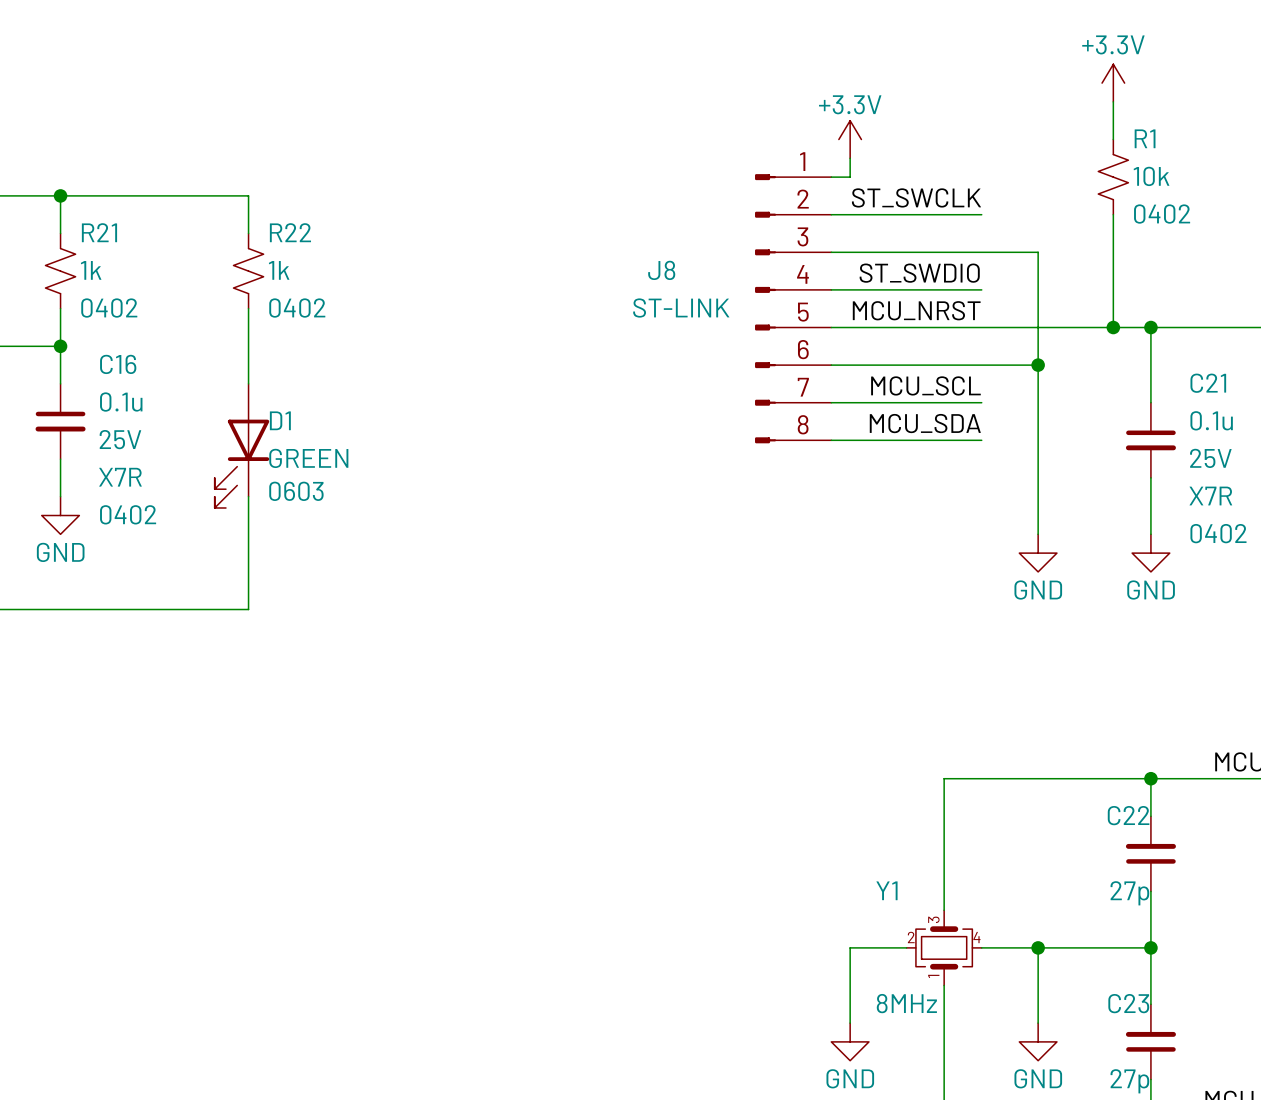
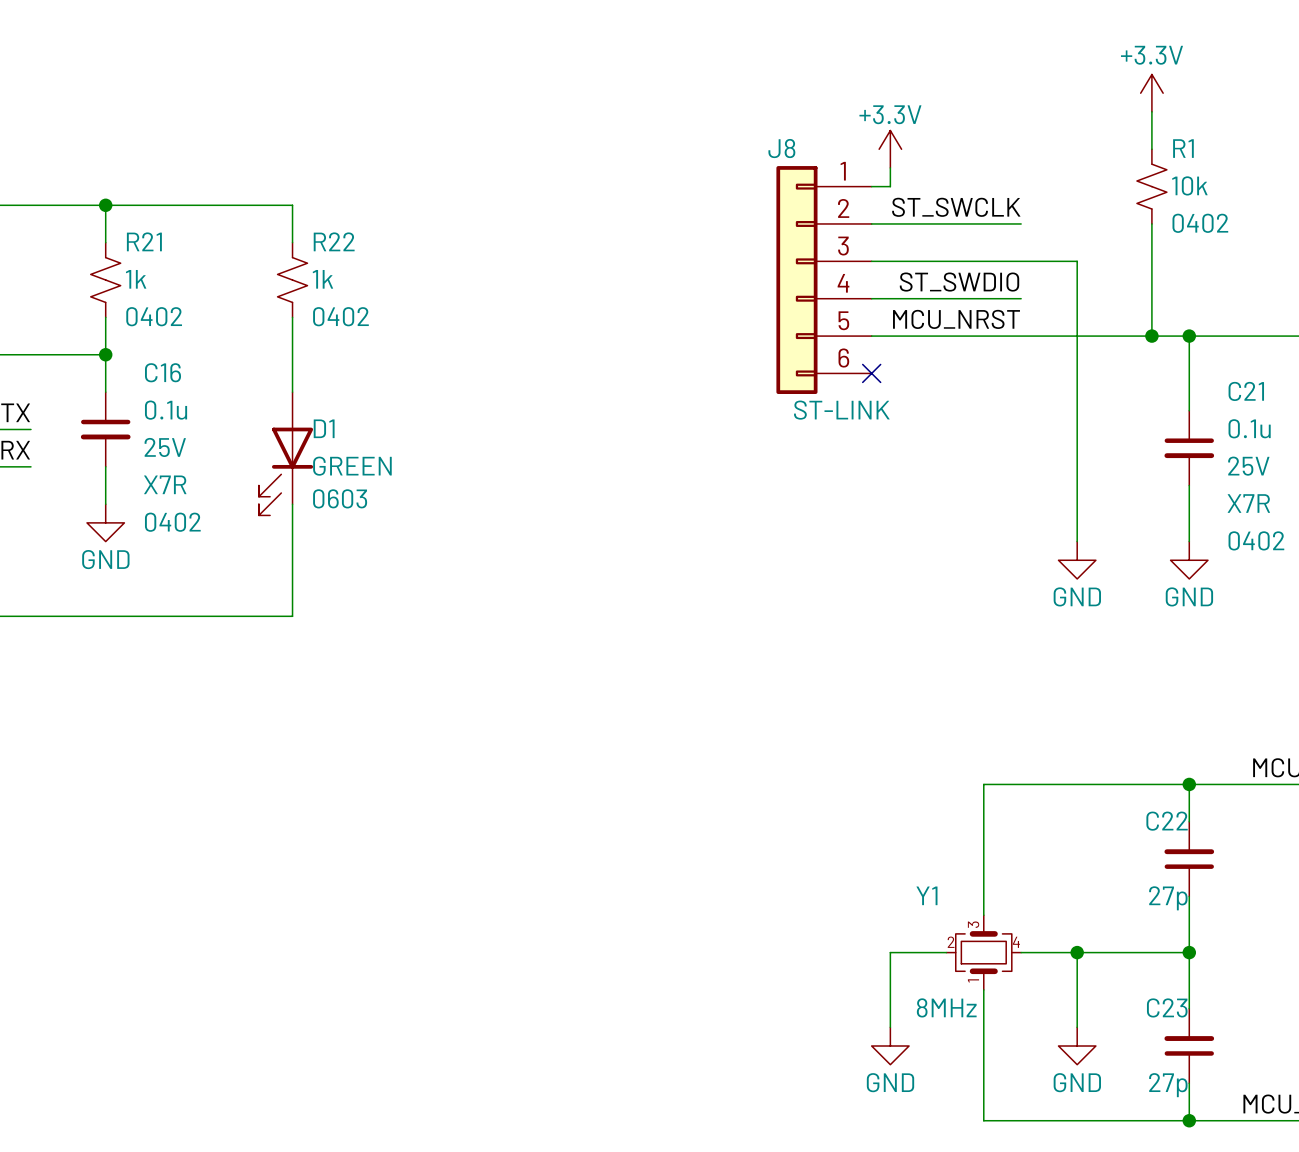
J8 symbol: [755, 174, 832, 444] -> [776, 166, 872, 394]
J8 name position: J8 (661, 270) -> J8 (781, 148)
J8 value position: ST-LINK (681, 308) -> ST-LINK (841, 410)
wire: (831, 365) (1038, 365) -> none
no-connect mark: none -> (871, 373)
junction: (1038, 365) -> none
label: MCU_SCL (925, 385) -> none
wire: (831, 402) (981, 402) -> none
label: MCU_SDA (925, 423) -> none
wire: (831, 440) (981, 440) -> none

